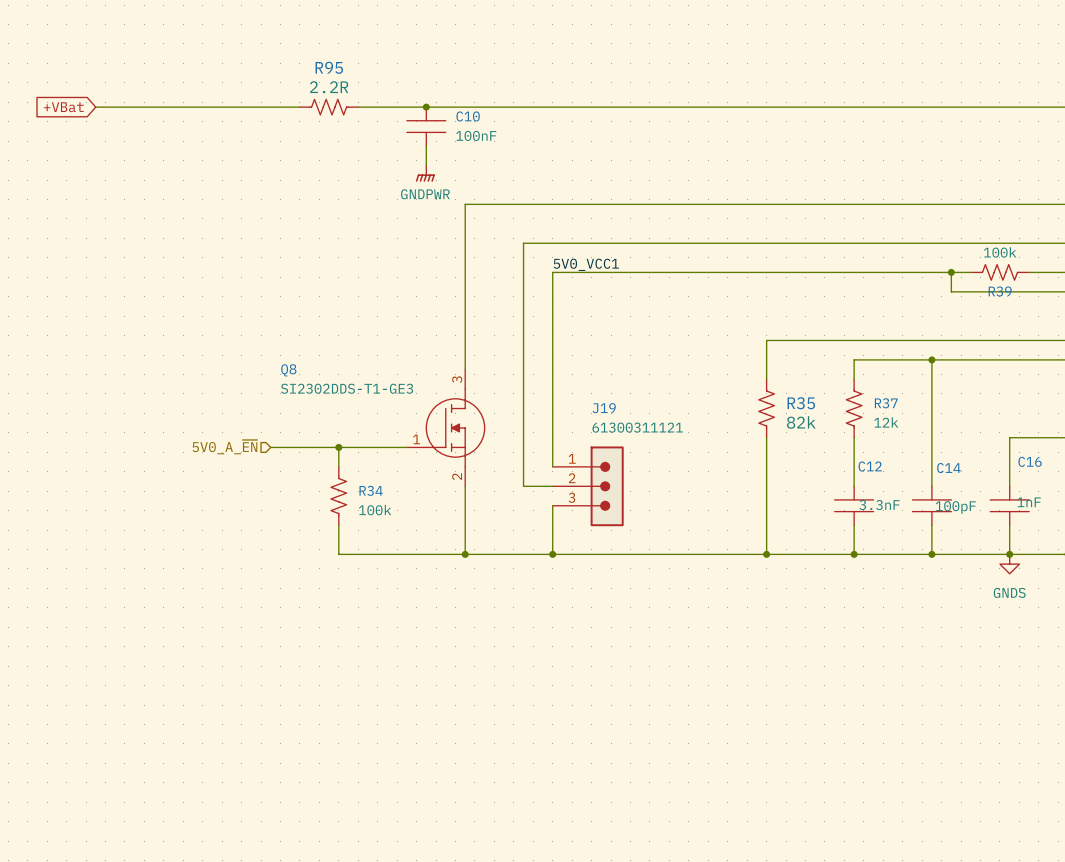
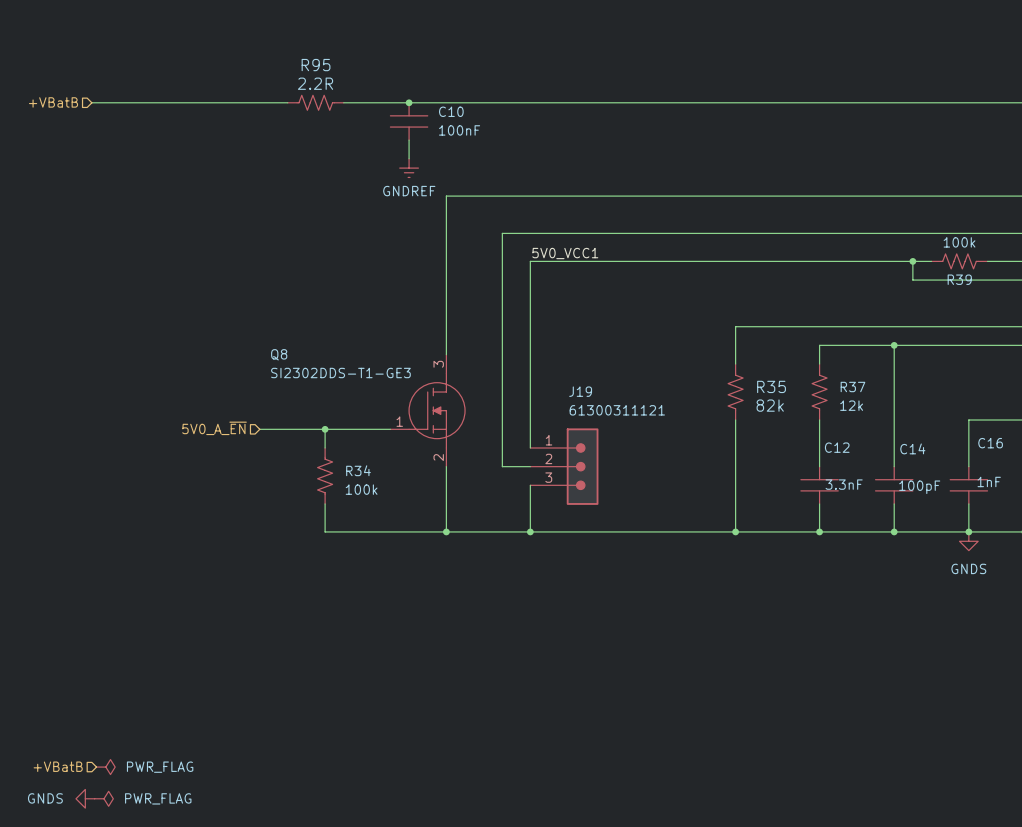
hierarchical label: none -> +VBatB (53, 102)
global label: +VBat (63, 107) -> none
power symbol: GNDPWR (425, 173) -> GNDREF (409, 168)
hierarchical label: none -> +VBatB (58, 766)
power symbol: none -> PWR_FLAG (105, 767)
power symbol: none -> GNDS (85, 798)
power symbol: none -> PWR_FLAG (103, 798)

